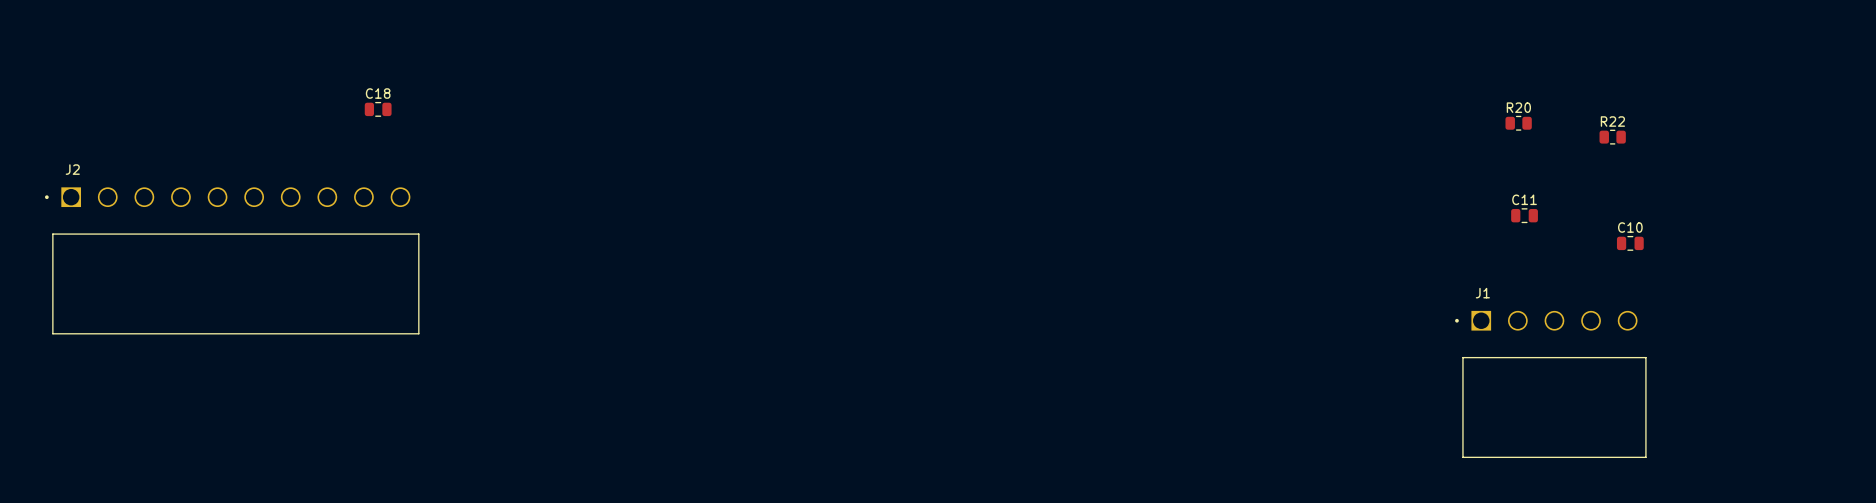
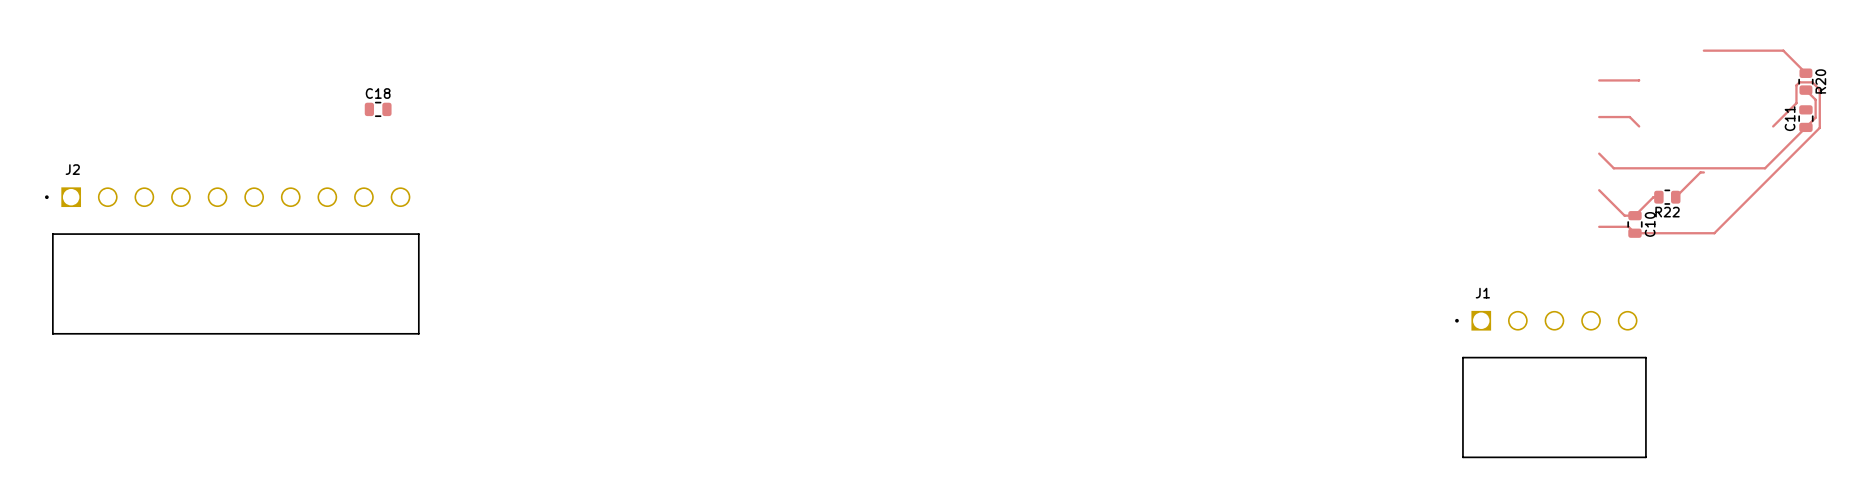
track: none -> (1703, 50) (1783, 50) (1805, 73)
track: none -> (1639, 80) (1599, 80)
track: none -> (1805, 90) (1815, 99) (1815, 117) (1765, 168) (1613, 168) (1599, 153)
track: none -> (1599, 117) (1629, 117) (1639, 126)
R22 name position: R22 (1612, 121) -> R22 (1667, 212)
R20 rotation: 0° (1518, 123) -> 90° clockwise (1805, 81)
R20 position: (1518, 123) -> (1805, 81)
track: none -> (1773, 126) (1796, 103) (1796, 85) (1799, 82) (1812, 82) (1819, 89) (1819, 127) (1714, 233) (1634, 233) (1628, 226) (1599, 226)
R22 position: (1612, 137) -> (1667, 197)
track: none -> (1703, 172) (1700, 172) (1675, 197)
track: none -> (1599, 190) (1624, 215) (1634, 215) (1653, 197) (1658, 197)
C11 name position: C11 (1524, 199) -> C11 (1790, 118)
C11 rotation: 0° (1524, 215) -> 90° clockwise (1805, 118)
C11 position: (1524, 215) -> (1805, 118)
C10 rotation: 0° (1630, 243) -> 90° clockwise (1634, 224)
C10 position: (1630, 243) -> (1634, 224)

